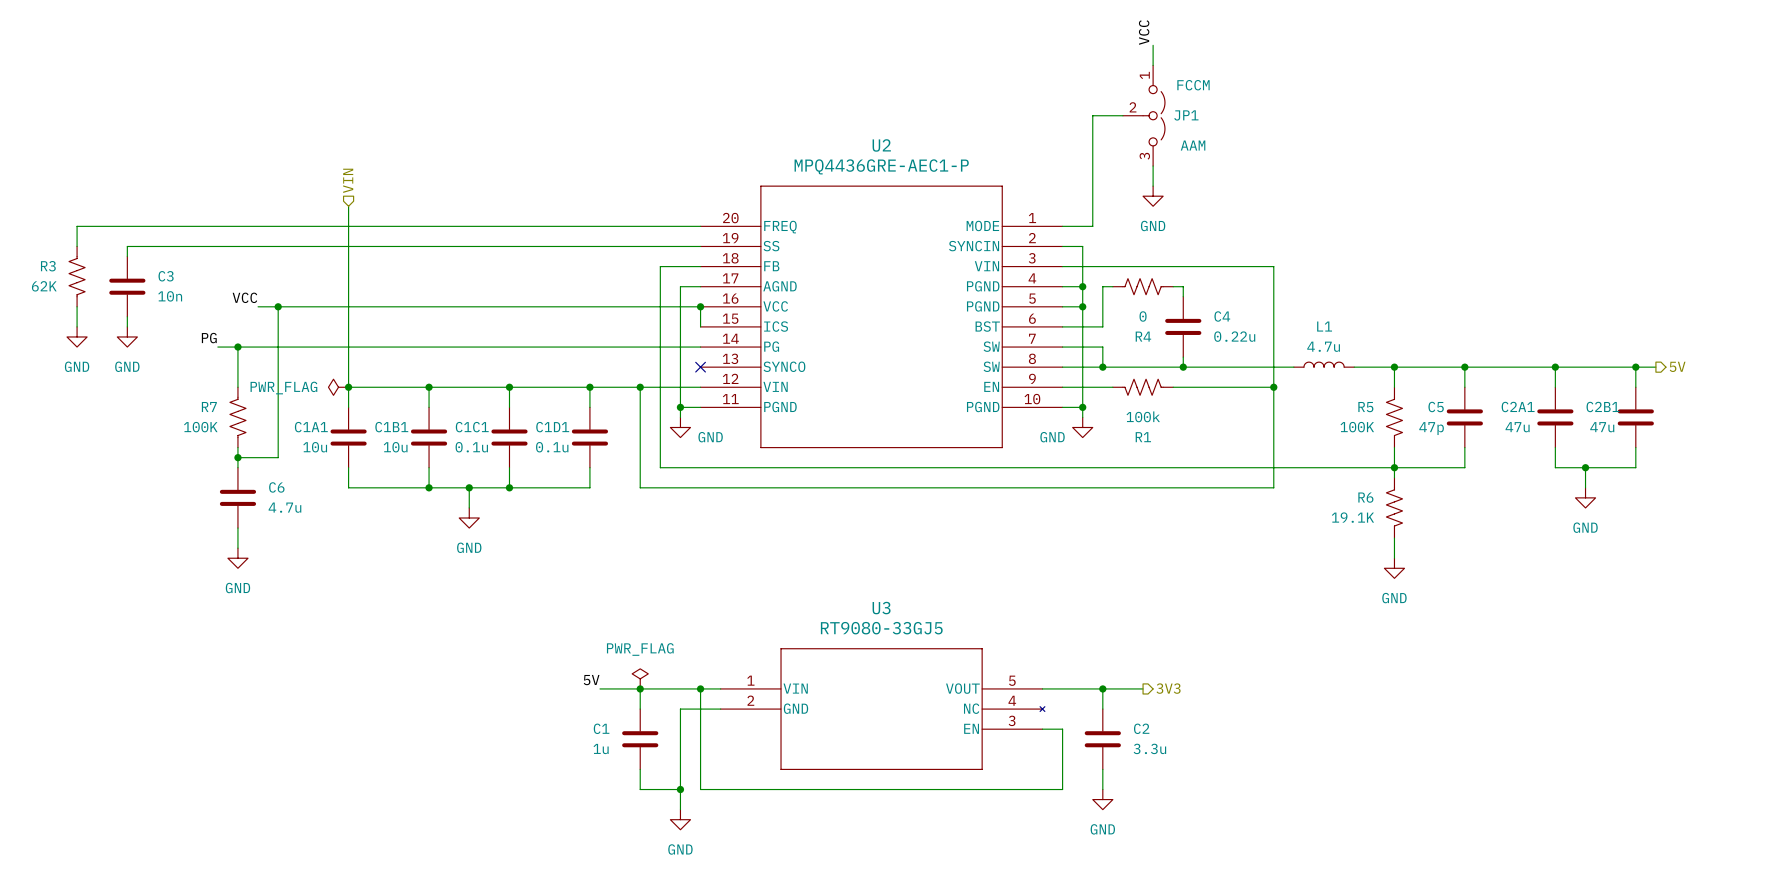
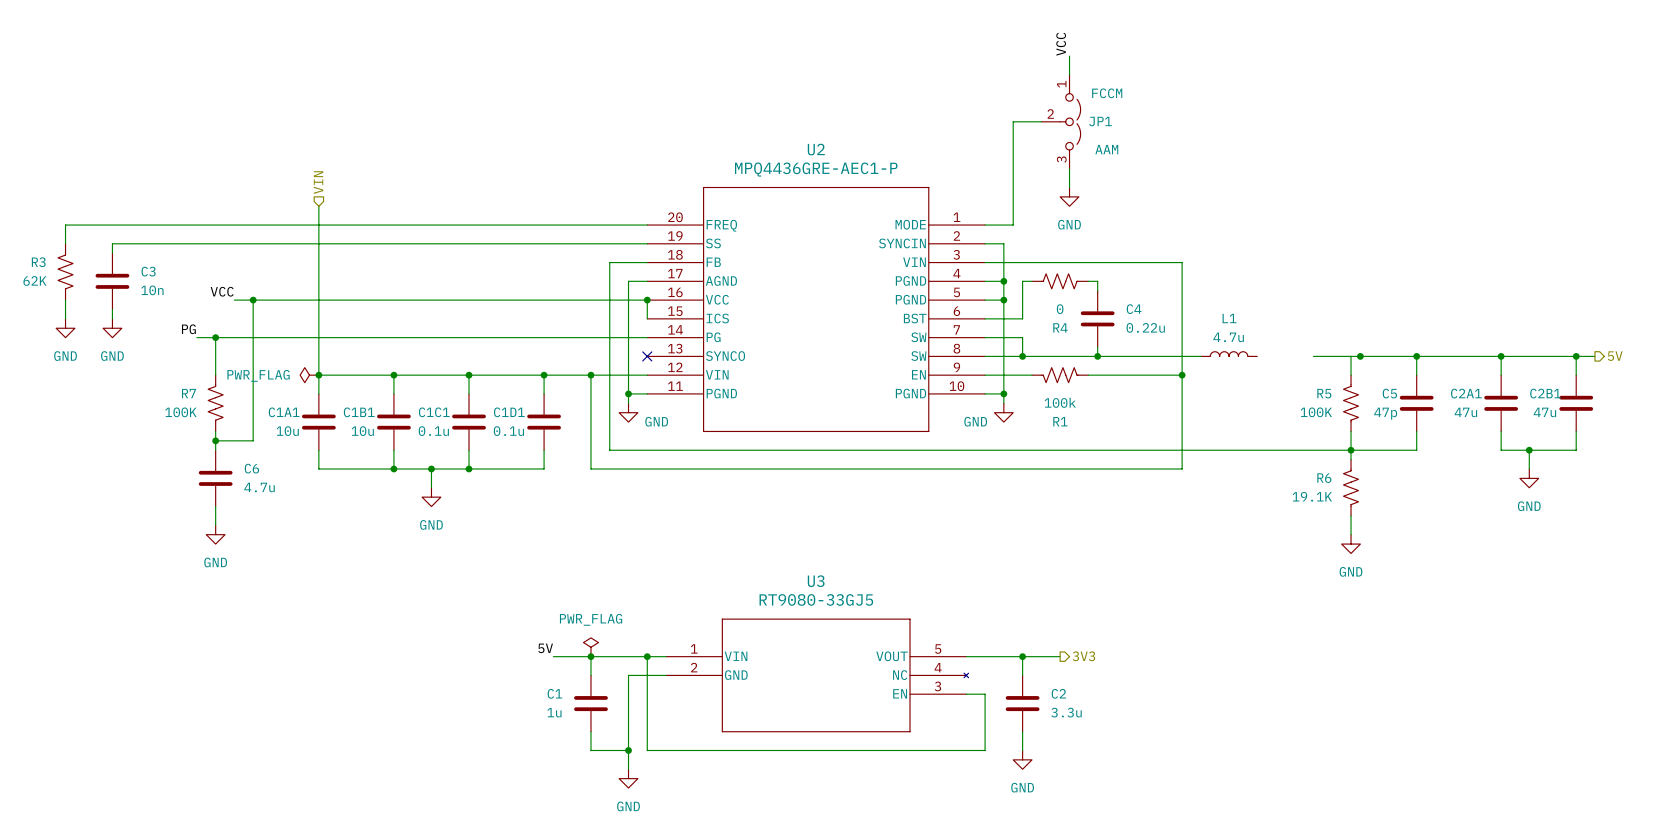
hierarchical label position: 5V (1677, 366) -> 5V (1615, 356)
wire: (1354, 367) (1414, 367) -> none
wire: (1394, 367) (1394, 387) -> (1351, 356) (1351, 375)
junction: (1394, 367) -> none
wire: (1464, 367) (1464, 387) -> (1416, 356) (1416, 375)
junction: none -> (1416, 356)
wire: (1555, 367) (1555, 387) -> (1501, 356) (1501, 375)
junction: (1555, 367) -> none
wire: (1635, 367) (1635, 387) -> (1576, 356) (1576, 375)
junction position: (1635, 367) -> (1501, 356)
wire: none -> (1538, 356) (1594, 356)
junction: none -> (1576, 356)
R5 position: (1394, 417) -> (1351, 403)
C5 position: (1464, 417) -> (1416, 403)
C2B1 position: (1555, 417) -> (1501, 403)
C2A1 position: (1635, 417) -> (1576, 403)
wire: (1394, 447) (1394, 477) -> (1351, 431) (1351, 459)
wire: (1464, 447) (1464, 467) -> (1416, 431) (1416, 450) (1360, 450)
wire: (1555, 447) (1555, 467) (1615, 467) -> (1501, 431) (1501, 450)
wire: (1635, 447) (1635, 467) -> (1576, 431) (1576, 450) (1519, 450)
junction: (1394, 467) -> none
junction: none -> (1351, 450)
wire: (1585, 467) (1585, 487) -> (1529, 450) (1529, 468)
junction: (1585, 467) -> none
junction: none -> (1529, 450)
power symbol position: GND (1585, 497) -> GND (1529, 478)
R6 position: (1394, 507) -> (1351, 487)
wire: (1394, 538) (1394, 558) -> (1351, 515) (1351, 534)
power symbol position: GND (1394, 568) -> GND (1351, 544)

